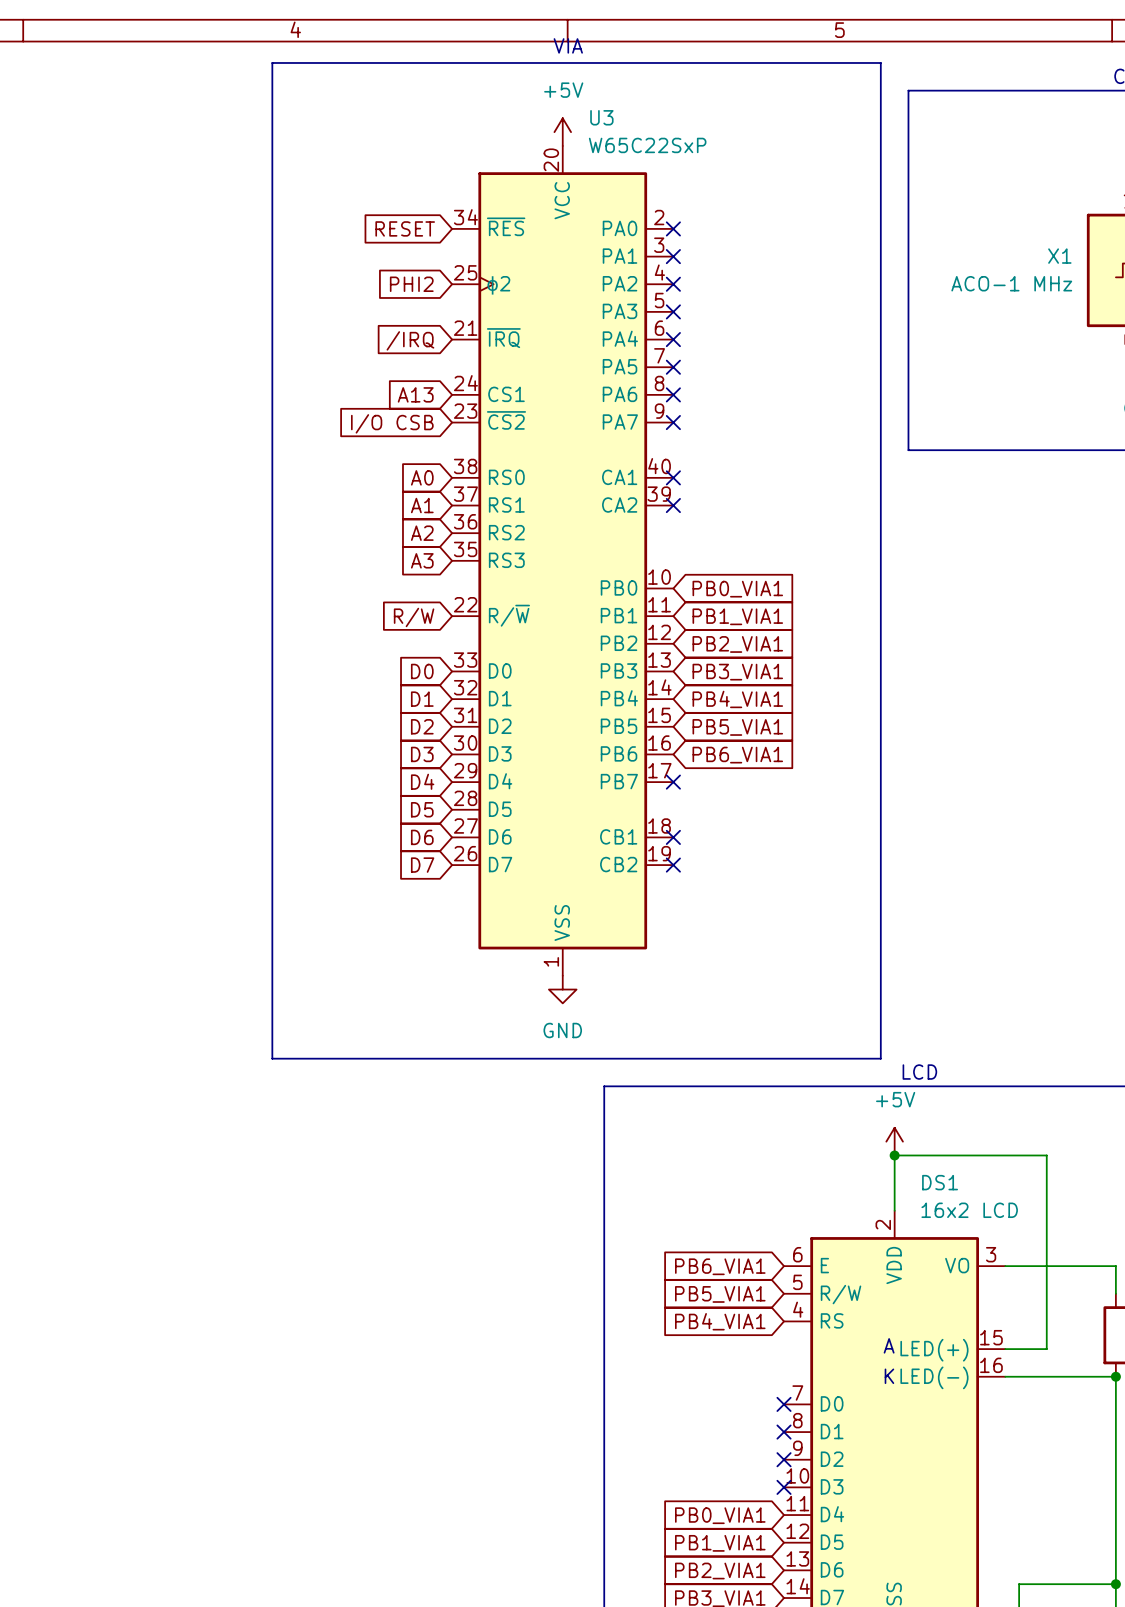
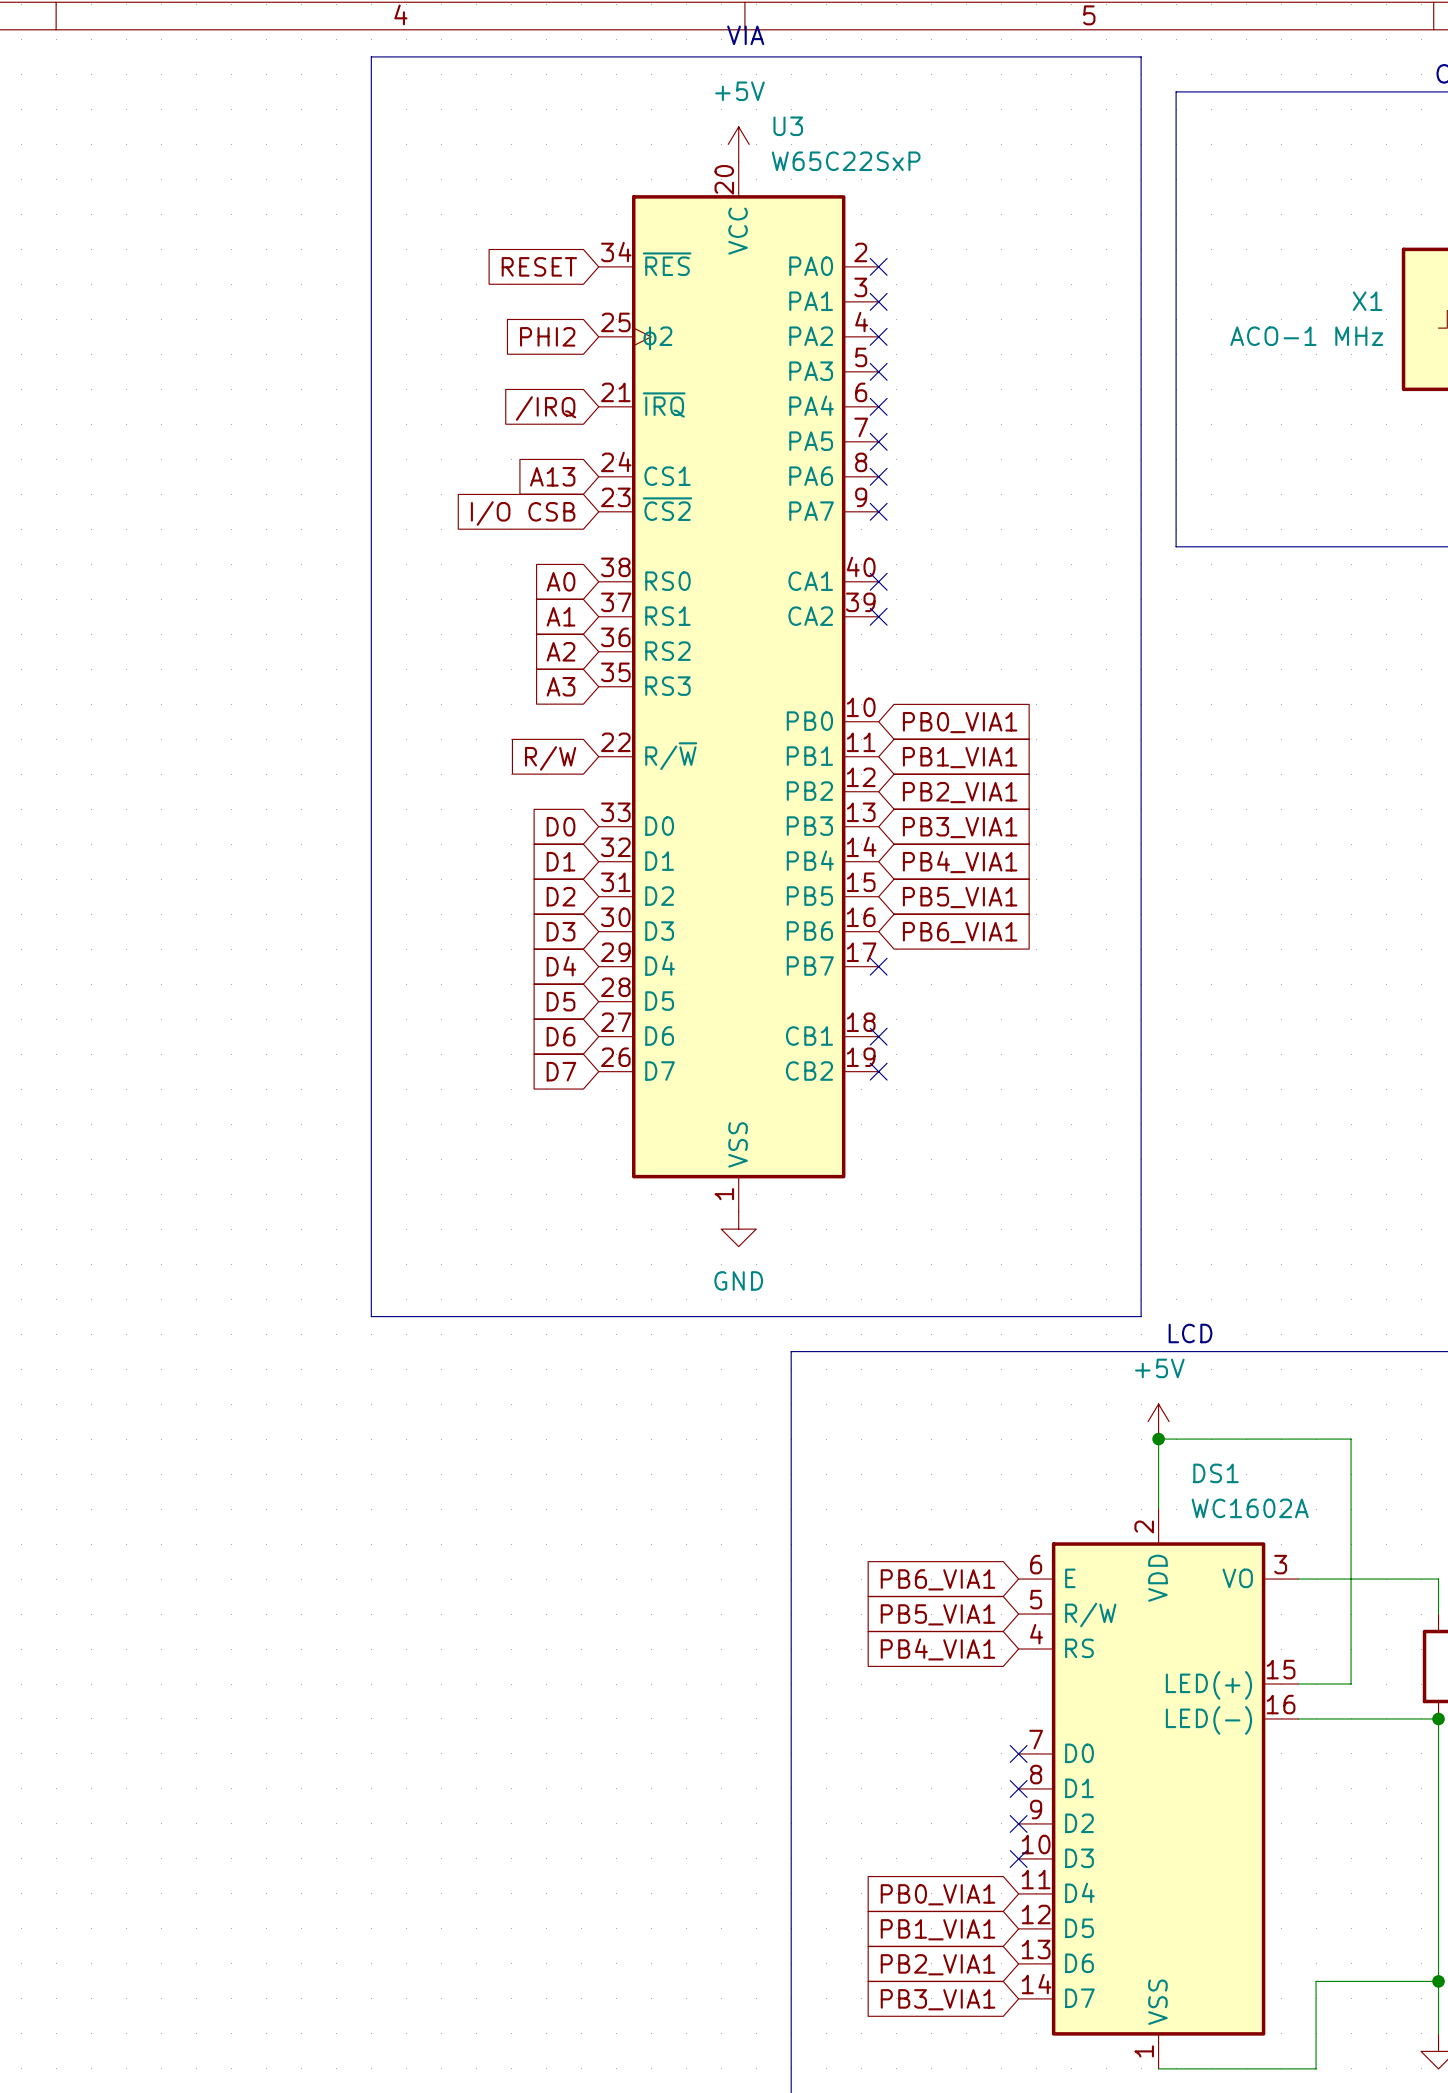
DS1 value: 16x2 LCD (969, 1210) -> WC1602A (1250, 1508)
text: A (889, 1345) -> none
text: K (889, 1376) -> none

